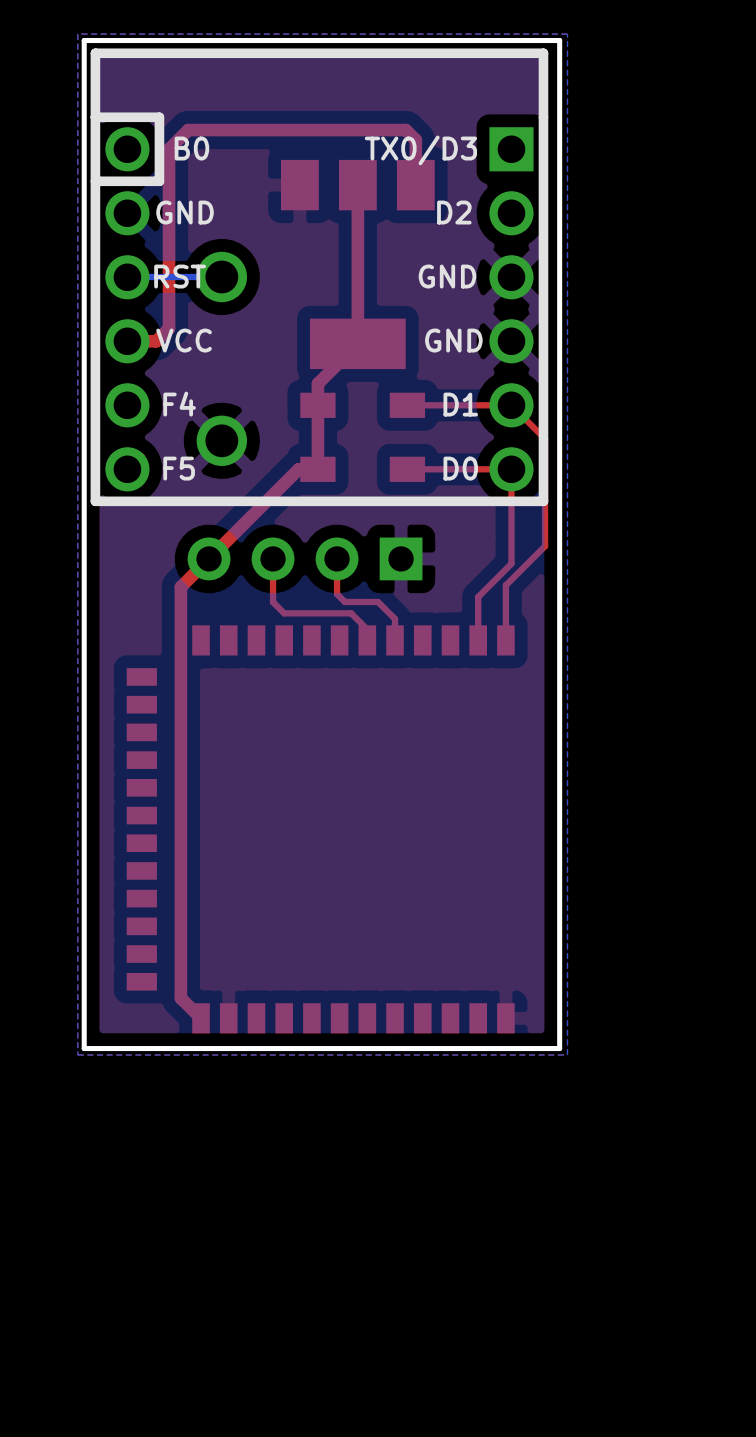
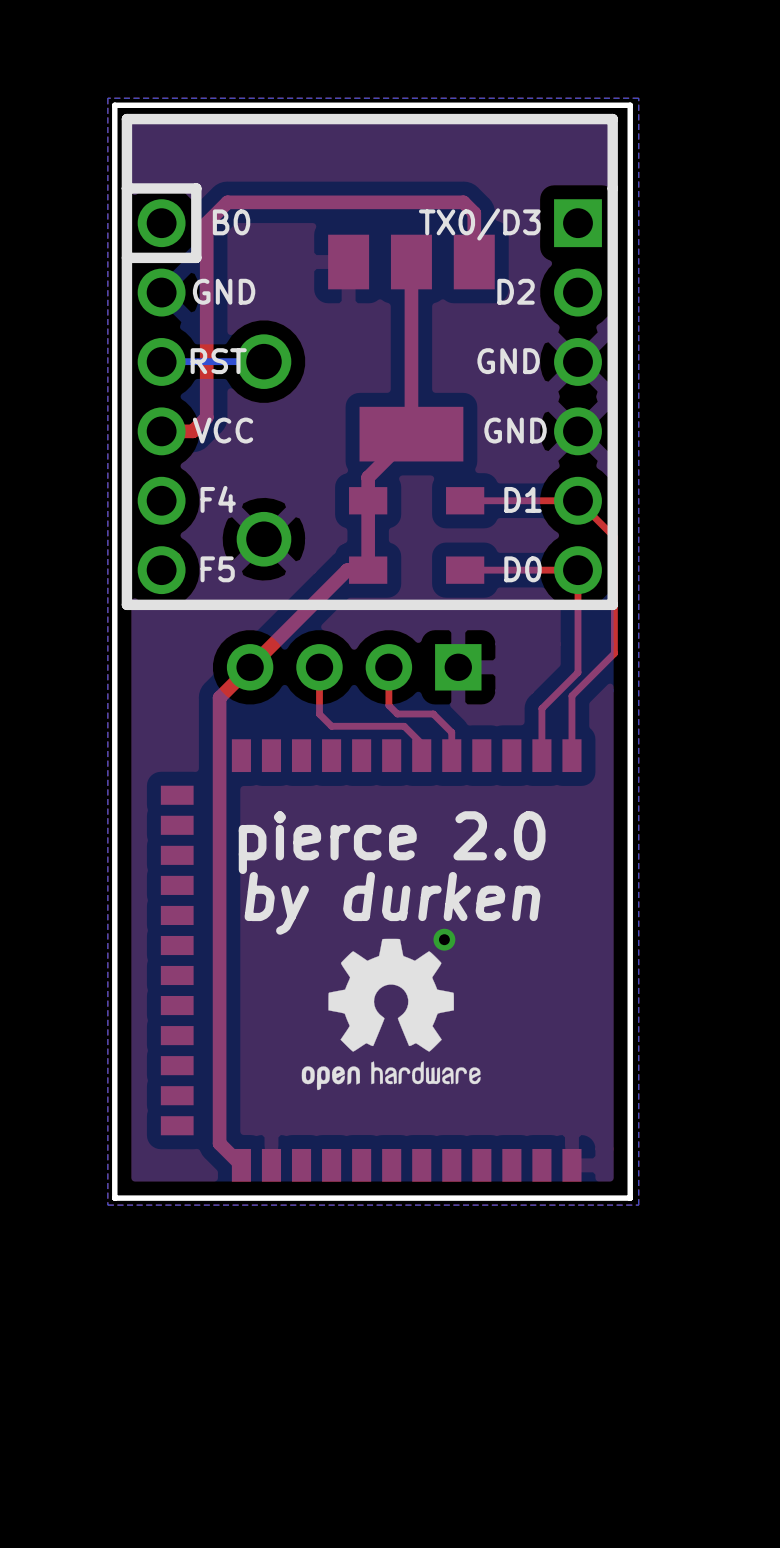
text: none -> pierce 2.0 (392, 842)
text: none -> by durken (392, 903)
drawing: none -> [301, 938, 481, 1091]
via: none -> (444, 939)

